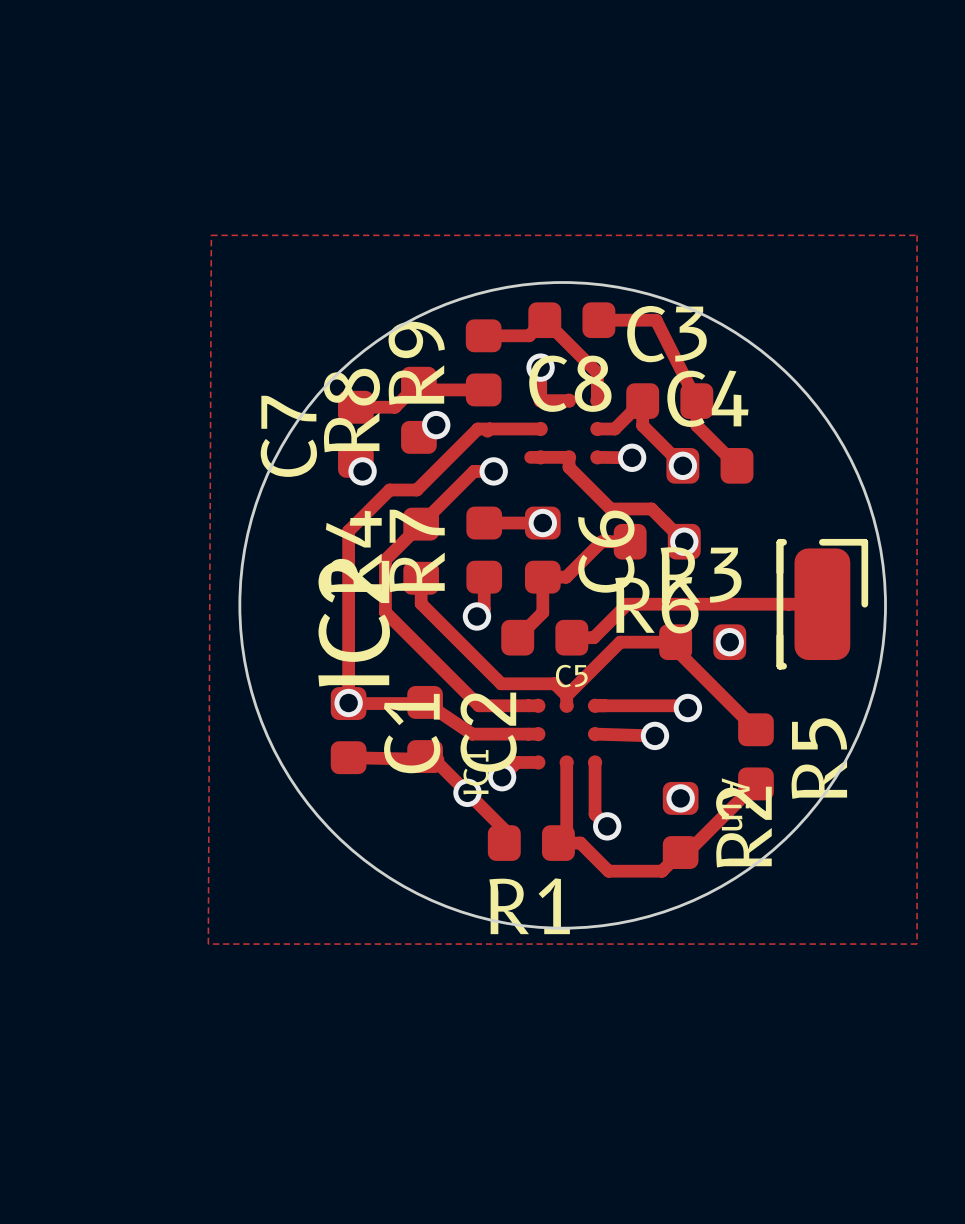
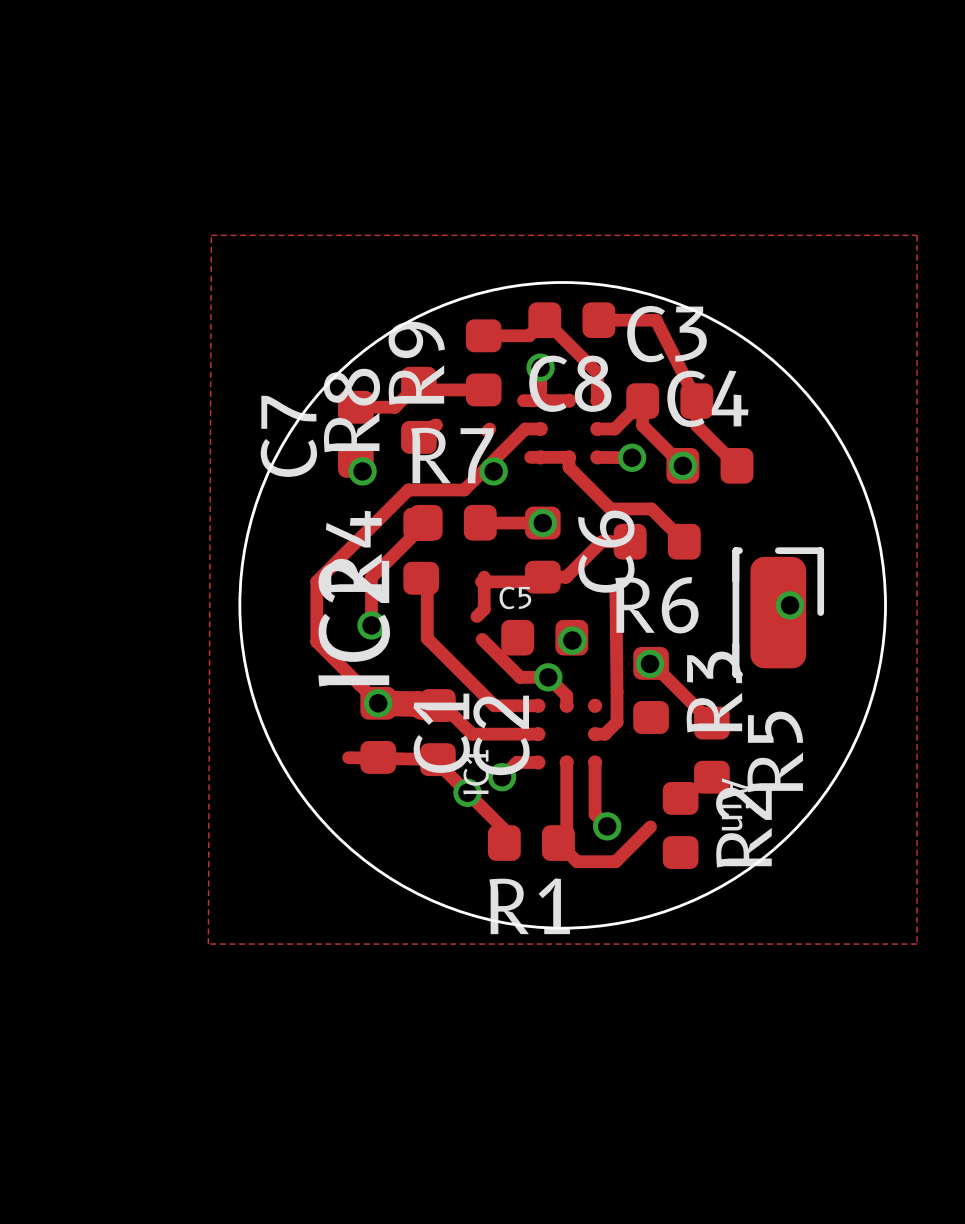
track: none -> (523, 400) (540, 400)
via: (436, 425) -> none
track: (525, 429) (477, 429) (416, 490) -> (525, 429) (464, 490) (416, 490)
track: (493, 471) (473, 471) (385, 559) (385, 612) (478, 705) (494, 705) -> (427, 581) (427, 638) (494, 705)
track: (408, 490) (389, 490) (348, 531) (348, 703) (425, 702) (472, 734) -> (408, 490) (316, 581) (316, 641) (378, 703) (418, 704) (421, 707) (445, 707) (472, 734)
track: none -> (426, 522) (371, 577) (371, 625)
via: (684, 541) -> none
R7 rotation: 0° (484, 550) -> 90° clockwise (453, 522)
track: (542, 577) (542, 612) (517, 637) -> none
track: (421, 578) (421, 603) (501, 683) (554, 683) -> (482, 639) (520, 677) (548, 677) (554, 683)
track: none -> (481, 581) (538, 581)
track: (822, 604) (627, 604) (593, 637) (571, 637) -> none
part position: (822, 604) -> (778, 612)
via: none -> (790, 605)
via: (476, 616) -> none
via: none -> (371, 625)
via: none -> (572, 640)
R3 rotation: 0° (702, 642) -> 90° clockwise (651, 690)
R3 position: (702, 642) -> (651, 690)
via: (729, 642) -> none
track: none -> (649, 663) (652, 663) (711, 723)
via: none -> (649, 663)
C5 name position: C5 (571, 676) -> C5 (515, 597)
via: none -> (548, 677)
track: (566, 695) (620, 642) (675, 642) (675, 649) (755, 729) -> none
via position: (348, 702) -> (378, 703)
track: (595, 705) (685, 705) (687, 708) -> none
via: (687, 708) -> none
C2 position: (425, 729) -> (437, 732)
C1 position: (348, 730) -> (378, 730)
track: (595, 734) (654, 735) -> (595, 734) (605, 734) (617, 722) (615, 591)
via: (654, 735) -> none
R5 position: (755, 756) -> (711, 750)
track: (755, 783) (687, 852) (680, 852) (662, 871) (608, 871) (580, 843) (558, 843) -> (650, 826) (615, 861) (577, 861) (558, 843)
via: (680, 798) -> none

